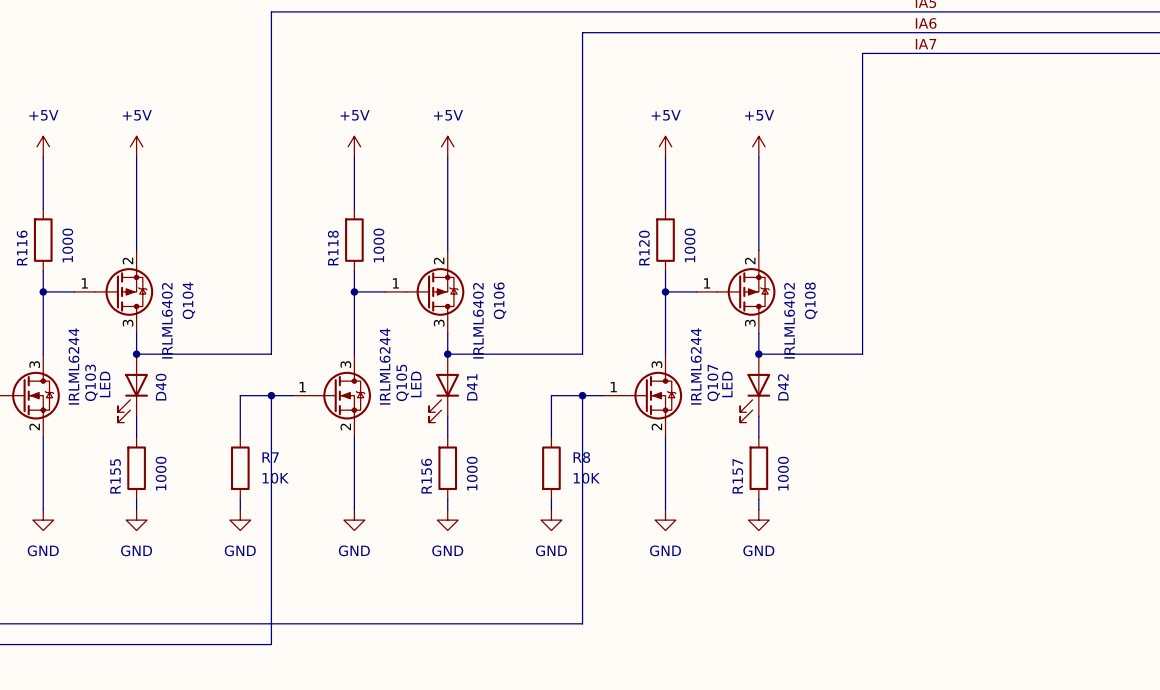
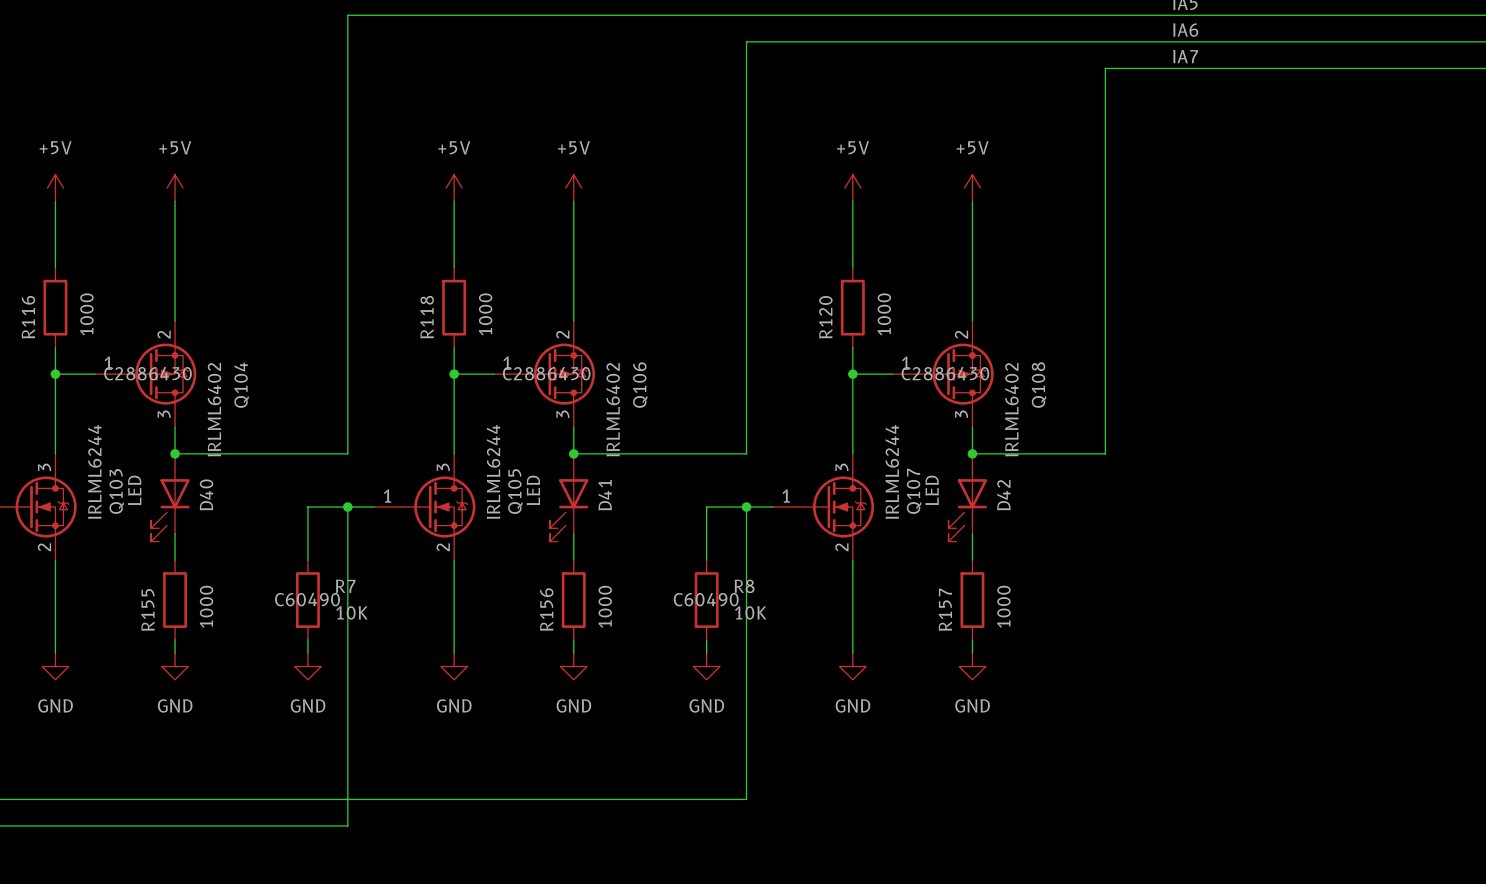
Q104 text: none -> C2886430 (148, 373)
Q106 text: none -> C2886430 (546, 373)
Q108 text: none -> C2886430 (945, 373)
R7 text: none -> C60490 (307, 599)
R8 text: none -> C60490 (706, 599)

